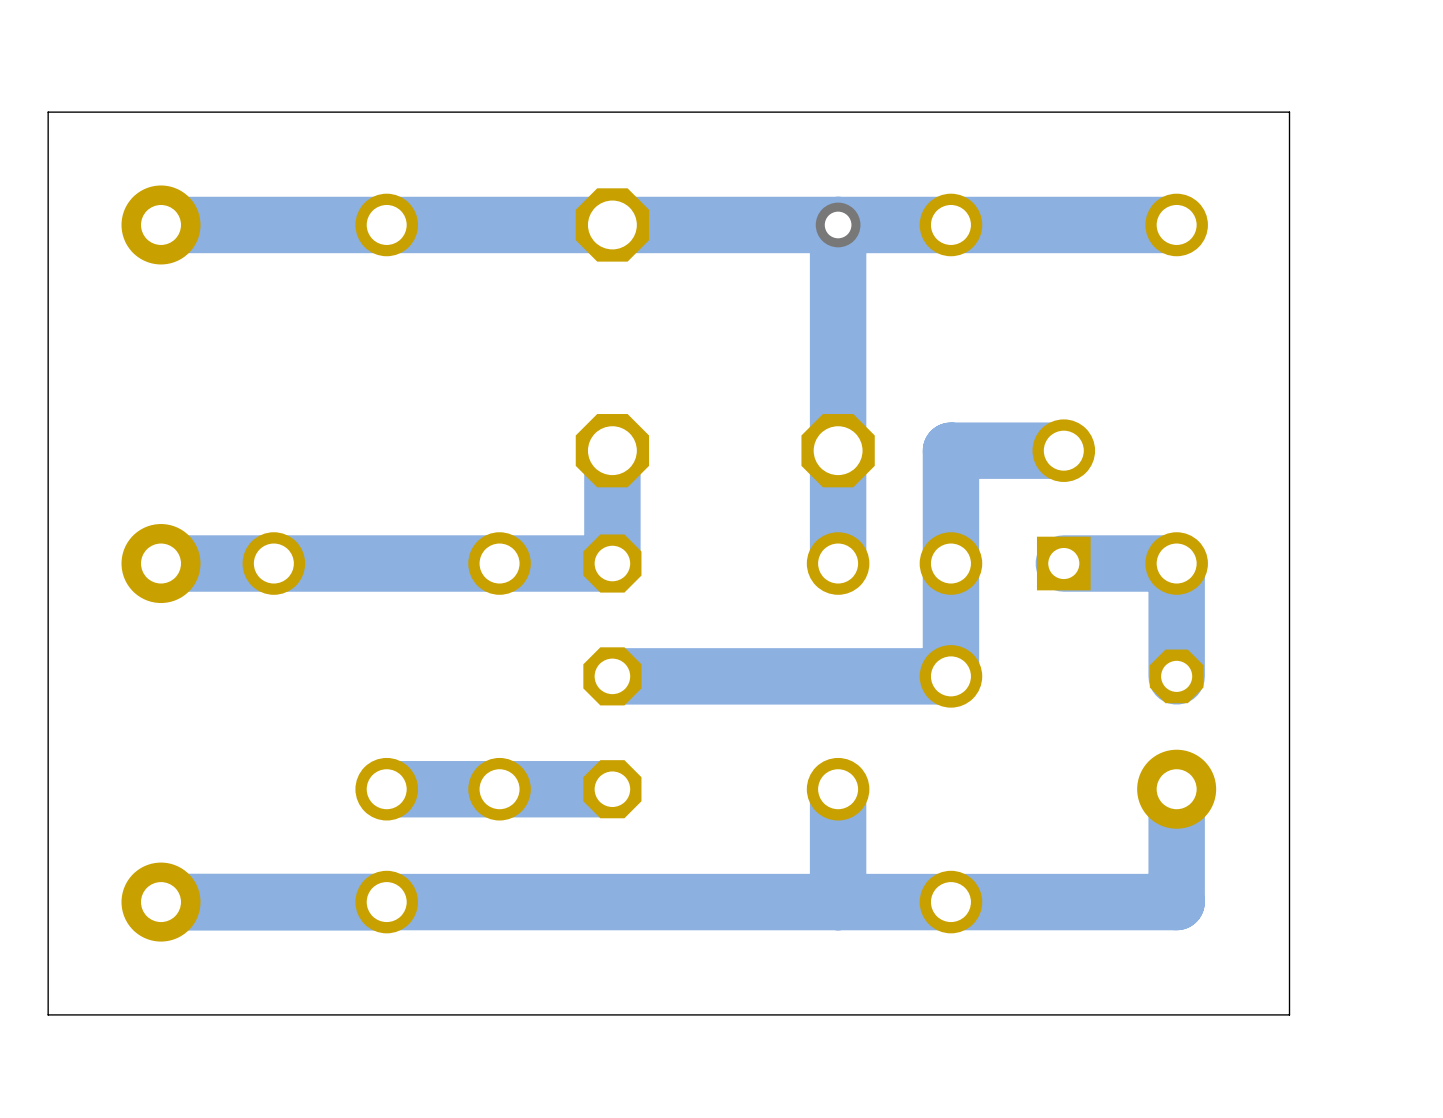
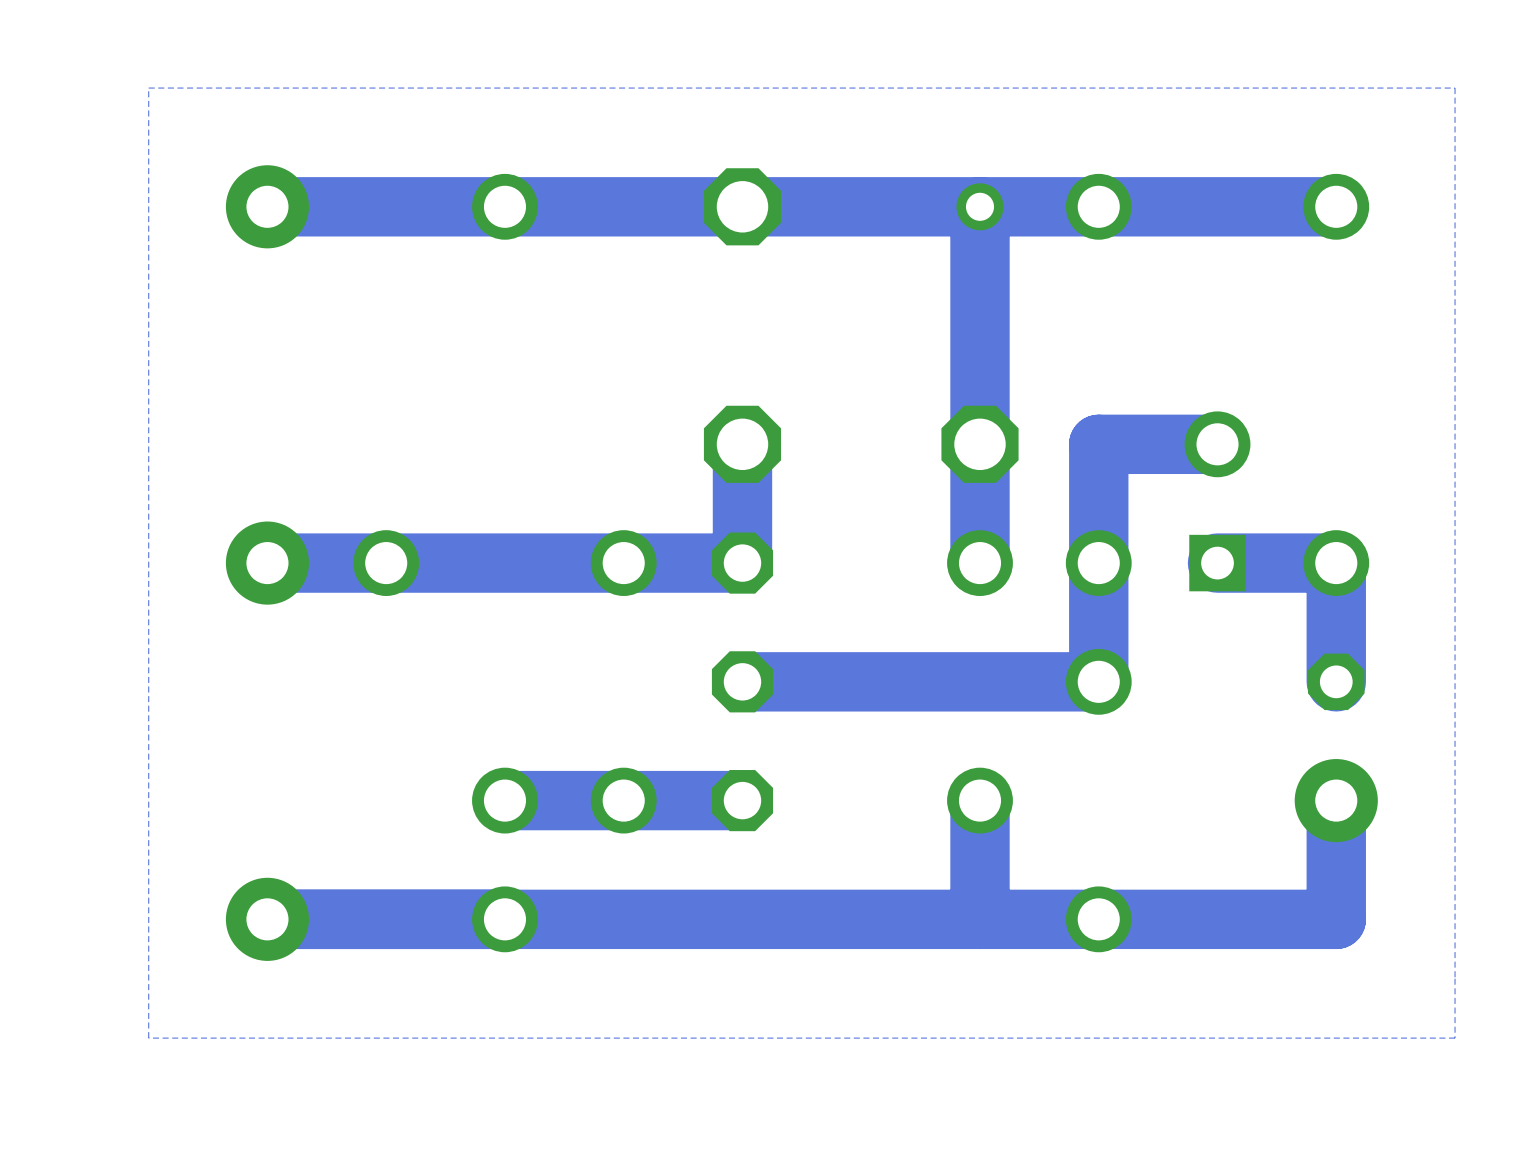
board edge: (1289, 112) (1289, 1014) (48, 1014) (48, 112) (1289, 112) -> none
zone outline: none -> (1455, 88) (148, 88) (148, 1038) (1455, 1038) (1455, 88)

